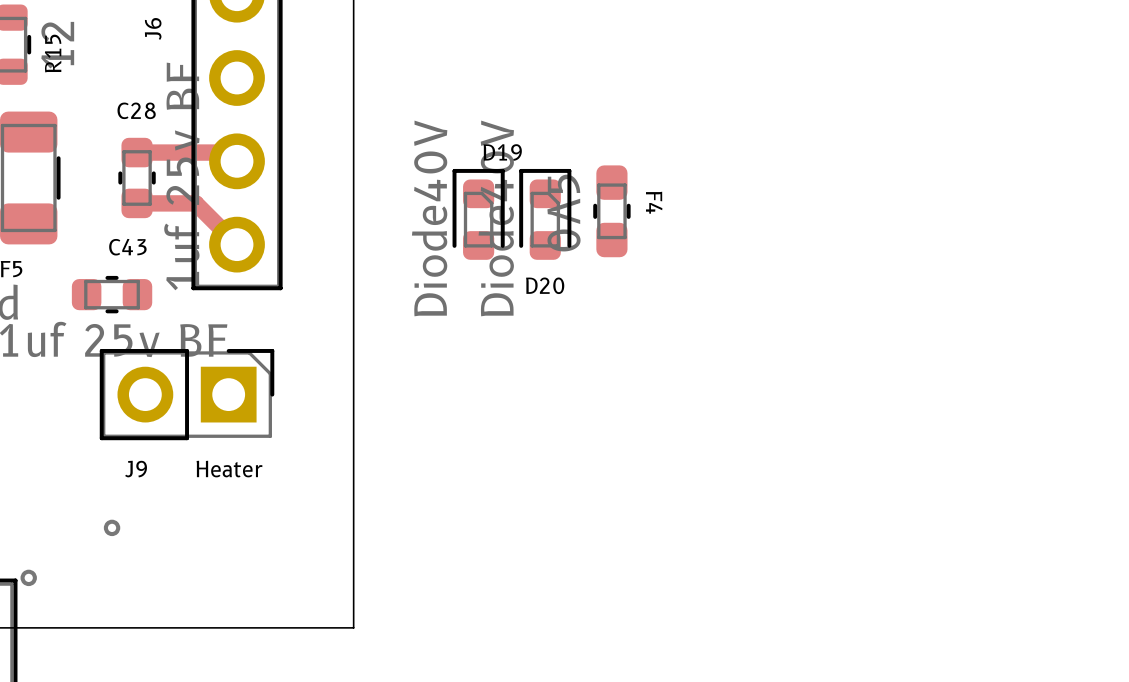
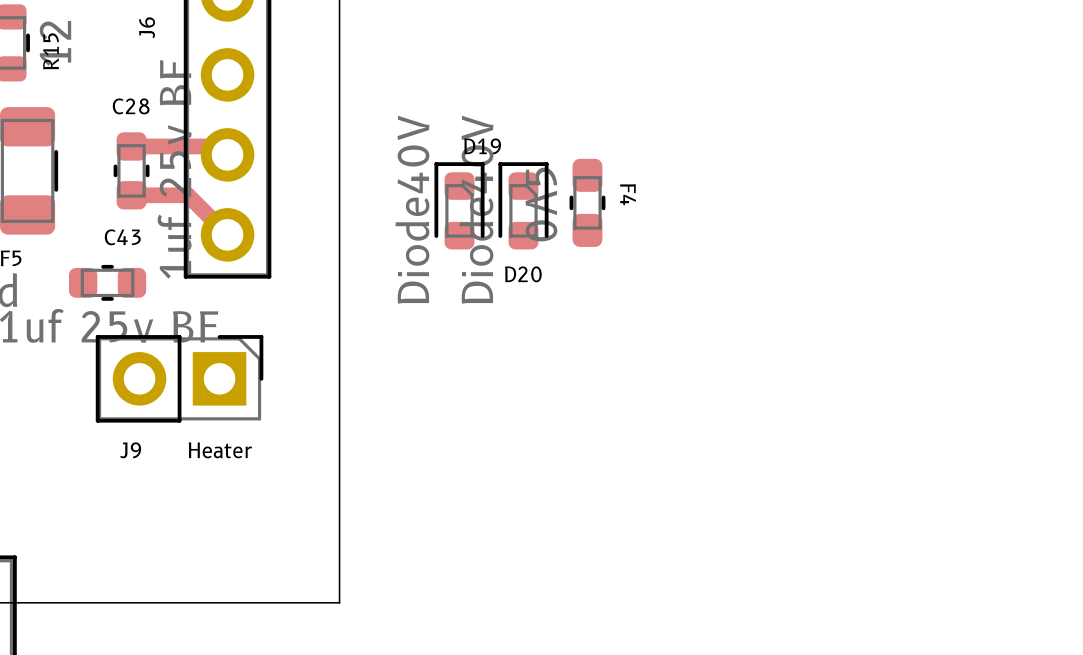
via: (112, 527) -> none
via: (28, 577) -> none

